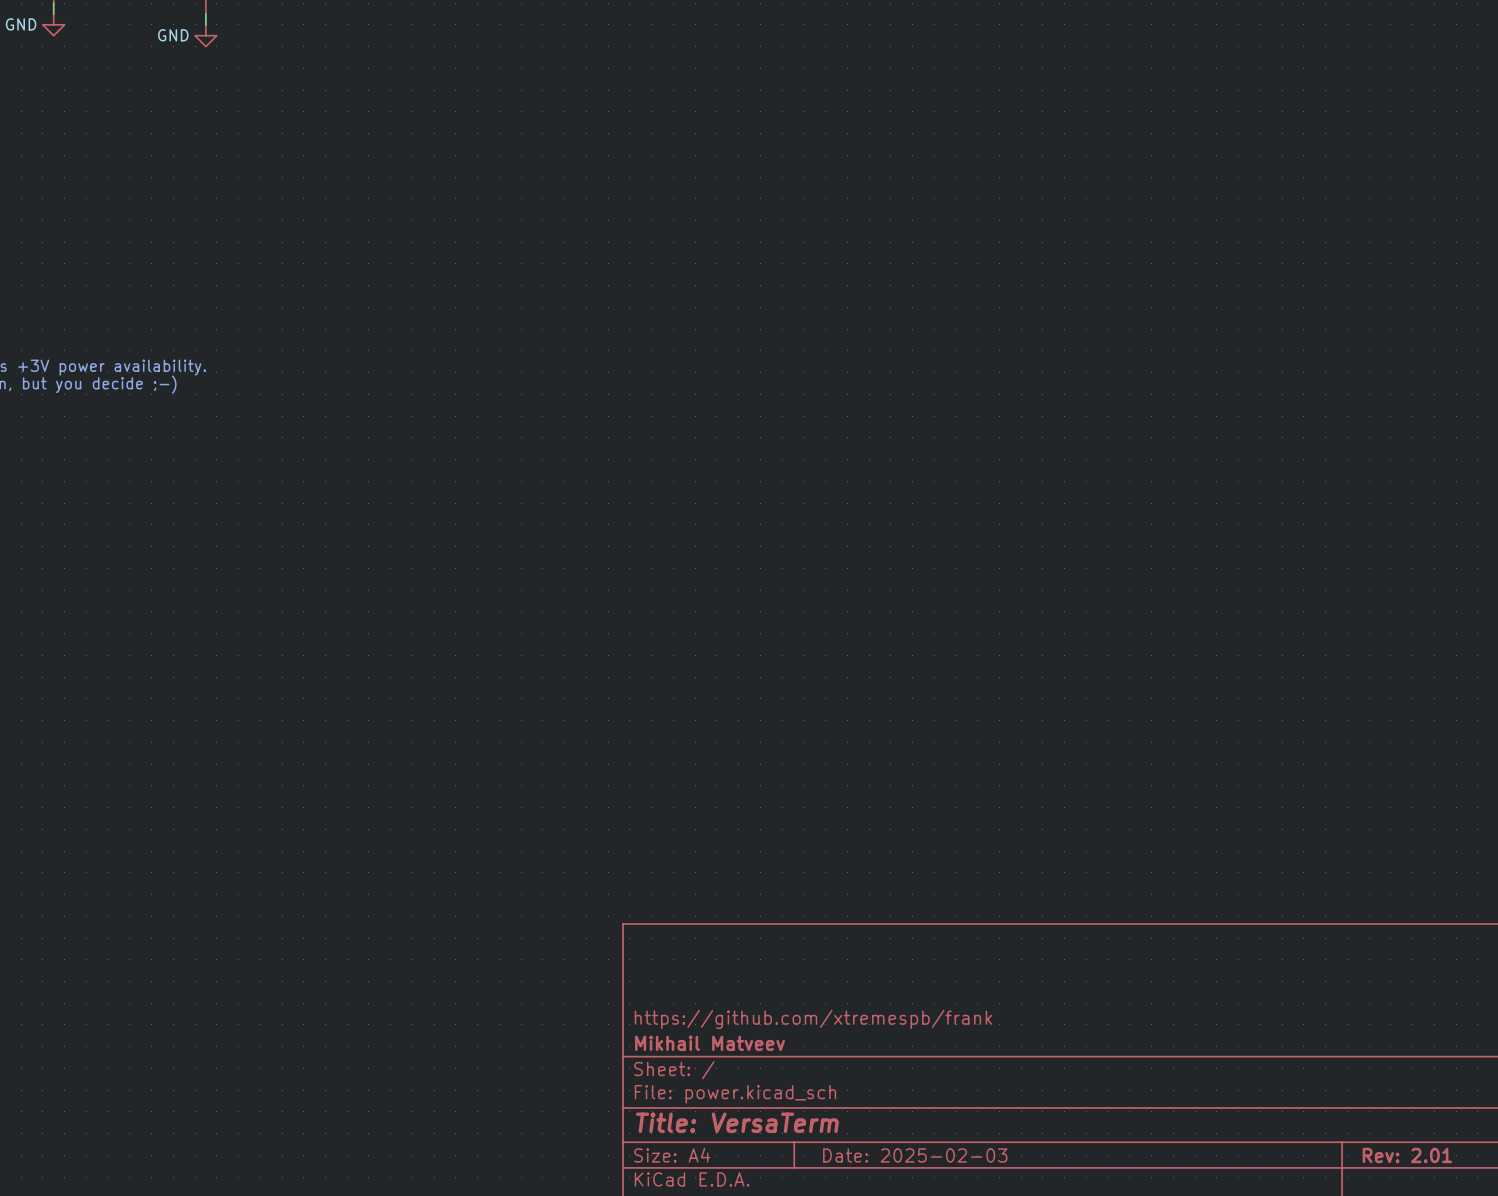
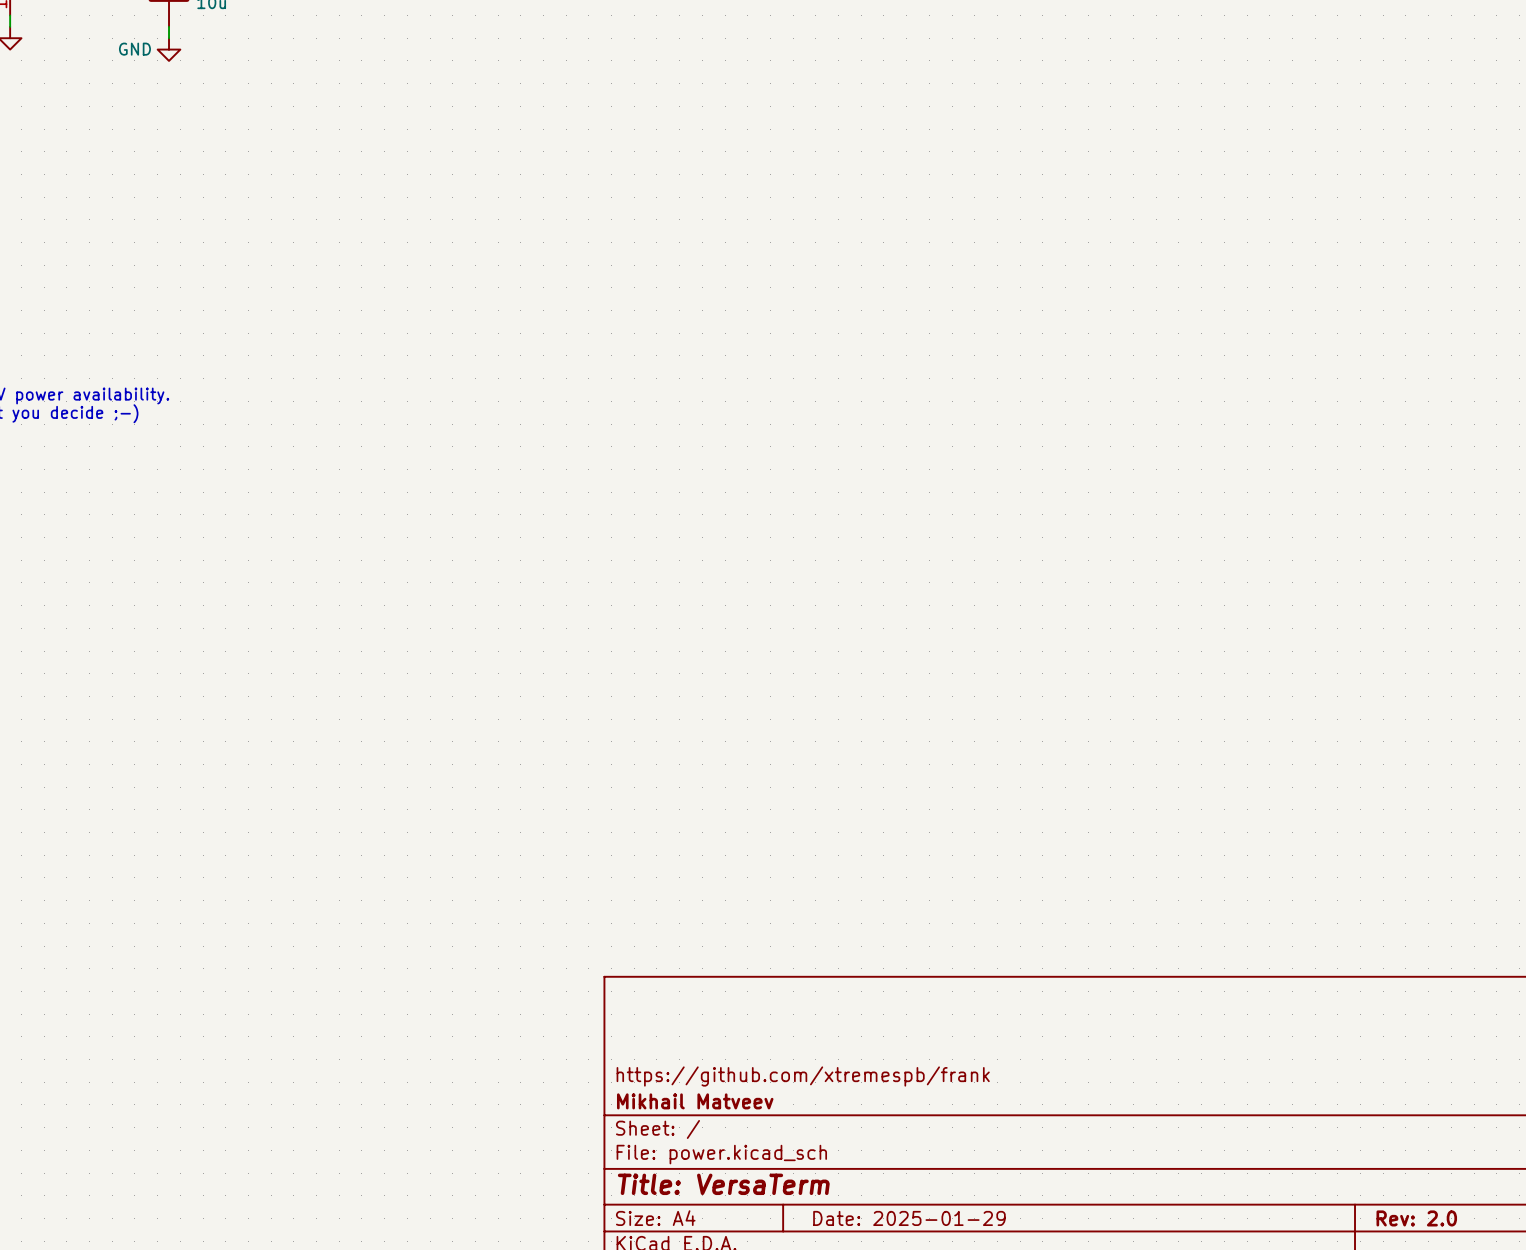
title block: Date: 2025-02-03 (915, 1155) -> Date: 2025-01-29 (909, 1218)
title block: Rev: 2.01 (1407, 1155) -> Rev: 2.0 (1416, 1218)

